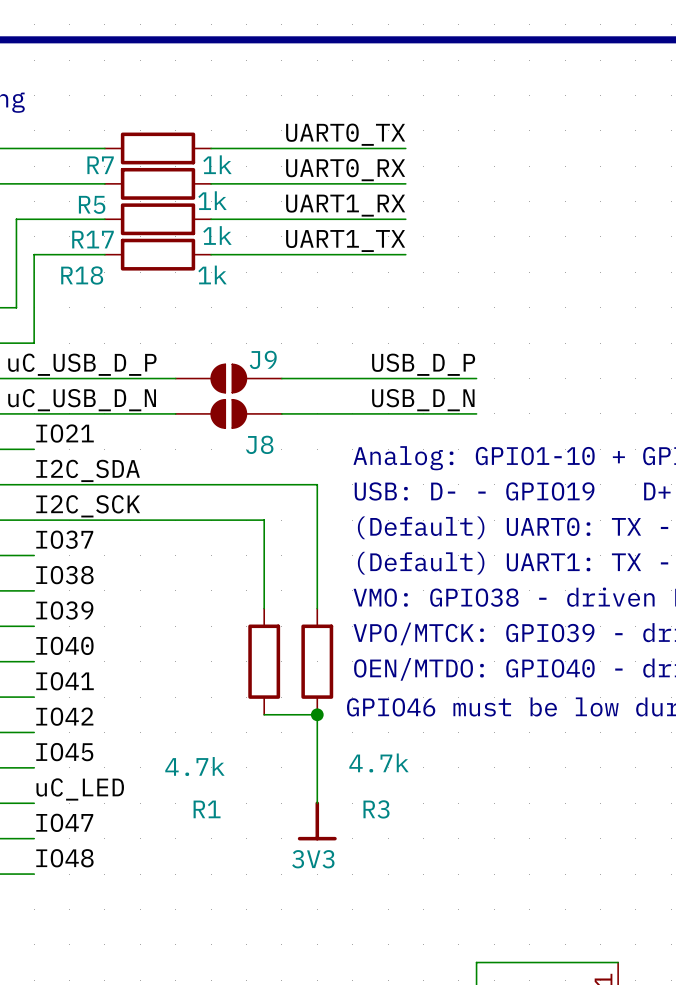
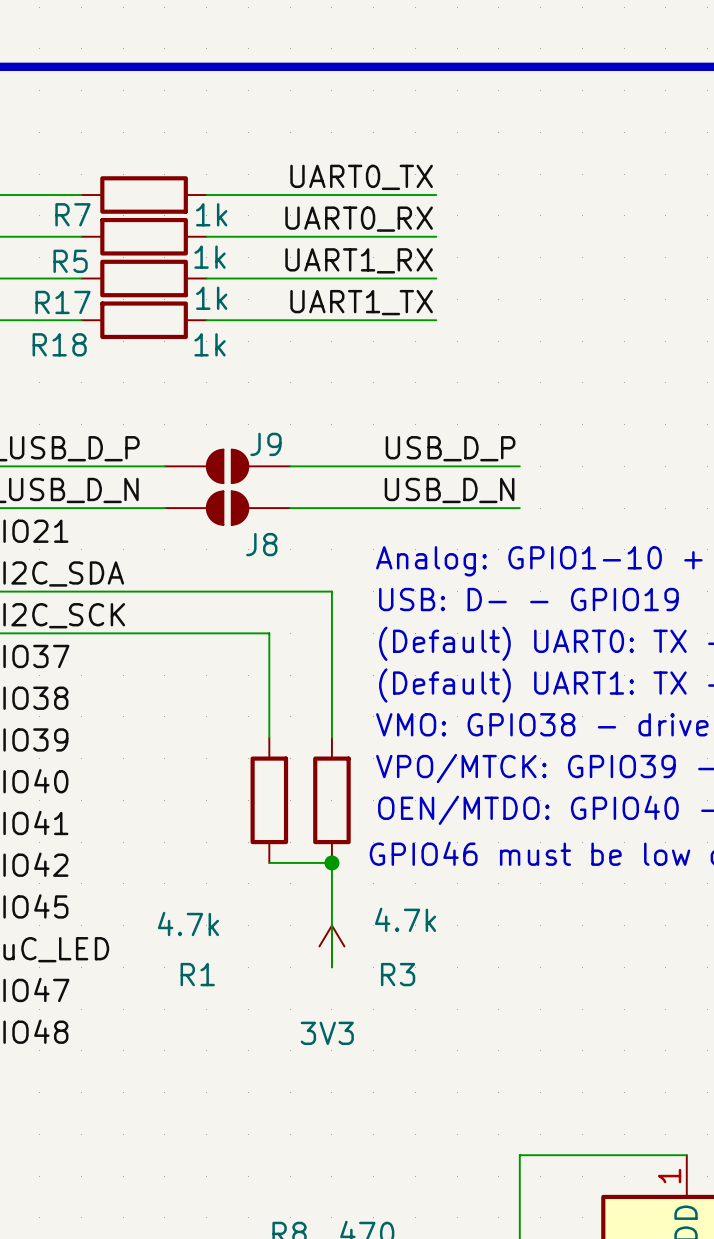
power symbol: none -> 3V3 (331, 946)
power symbol: 3V3 (317, 820) -> none

